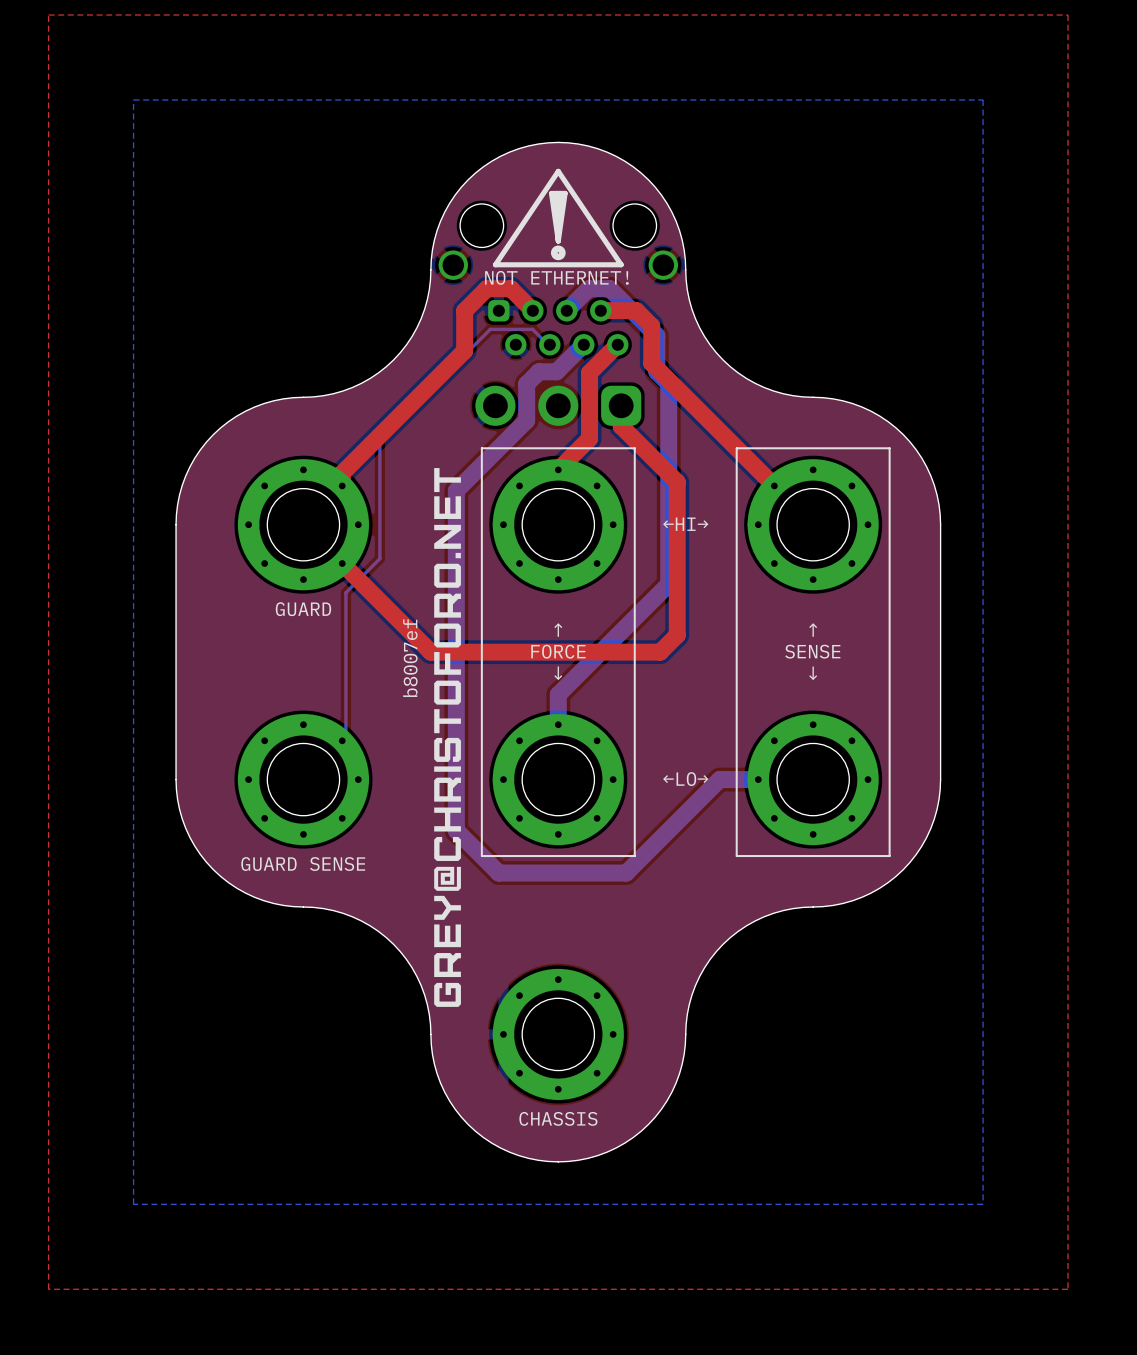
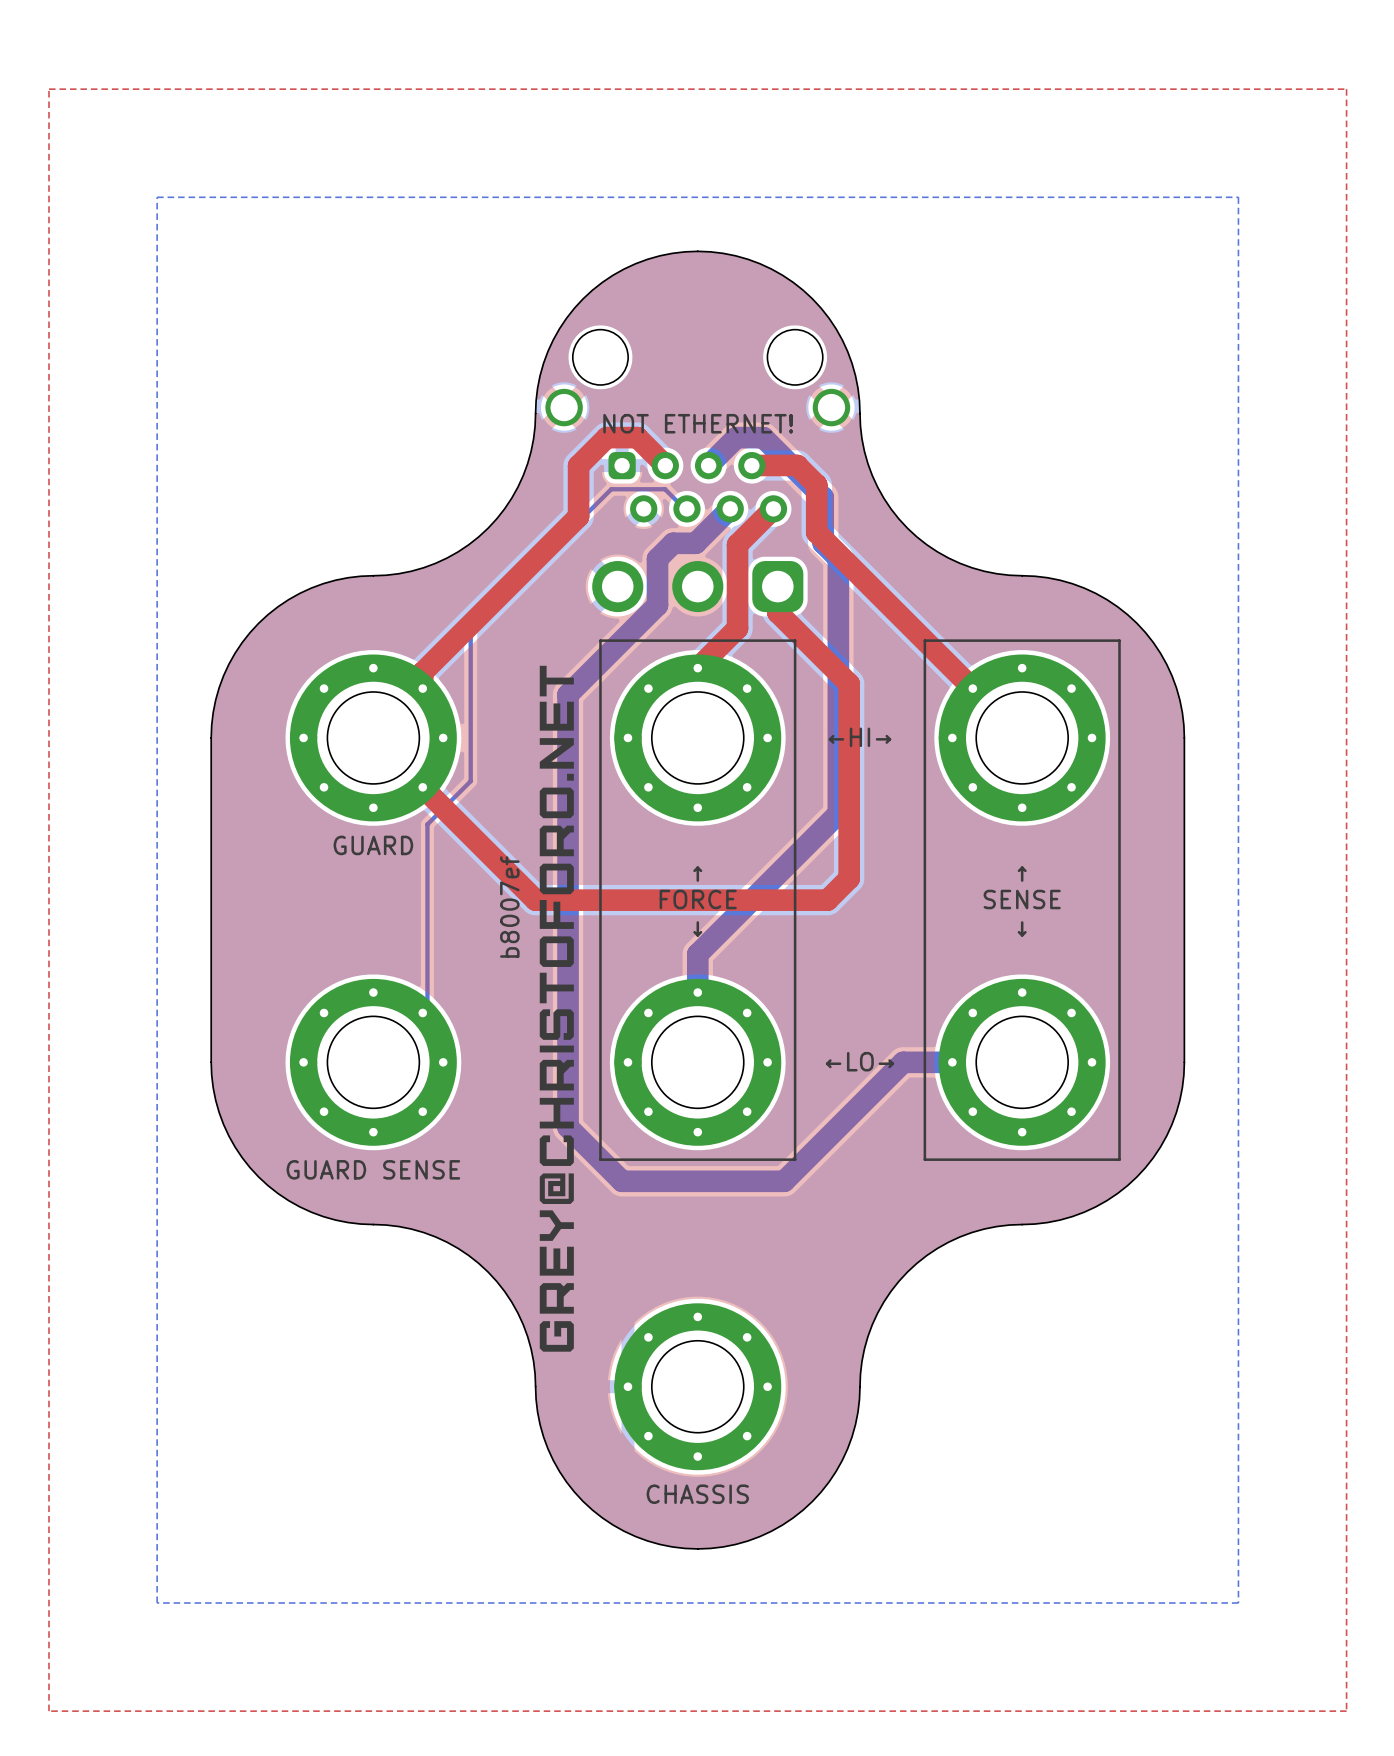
drawing: [492, 168, 624, 268] -> none

